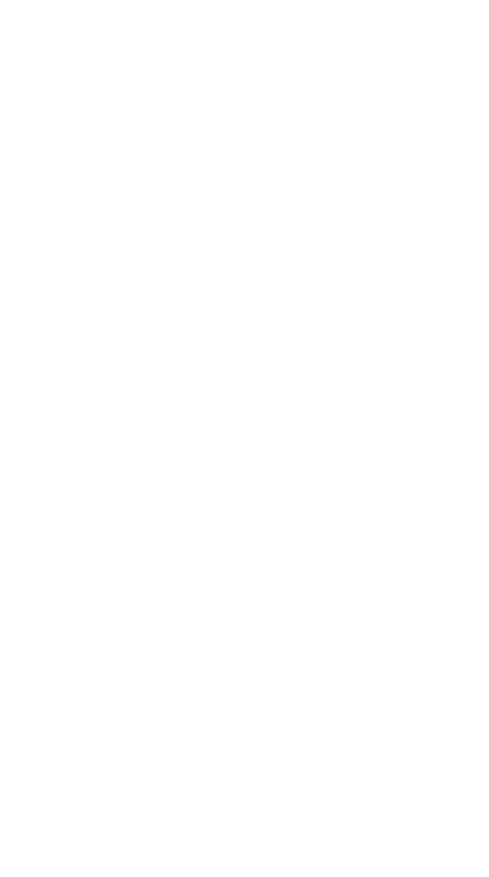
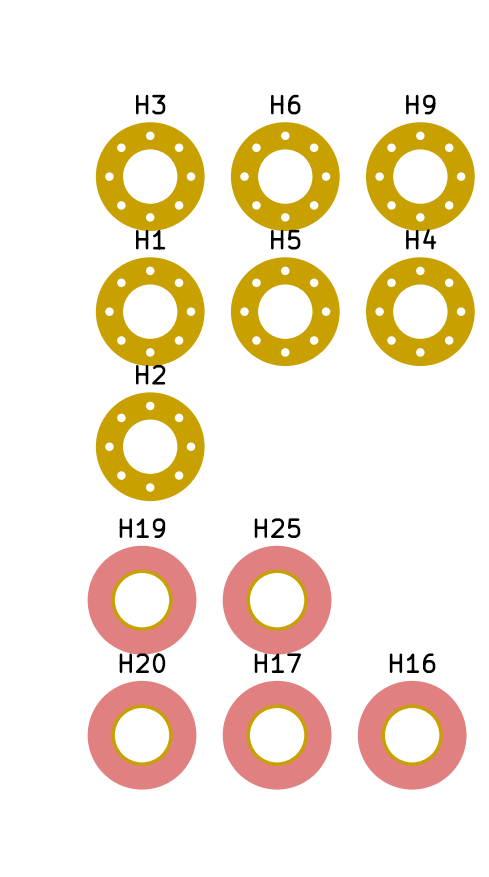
H3: none -> (150, 176)
H6: none -> (285, 176)
H9: none -> (420, 176)
H1: none -> (150, 311)
H5: none -> (285, 311)
H4: none -> (420, 311)
H2: none -> (150, 446)
H19: none -> (142, 600)
H25: none -> (277, 600)
H20: none -> (142, 735)
H17: none -> (277, 735)
H16: none -> (412, 735)

